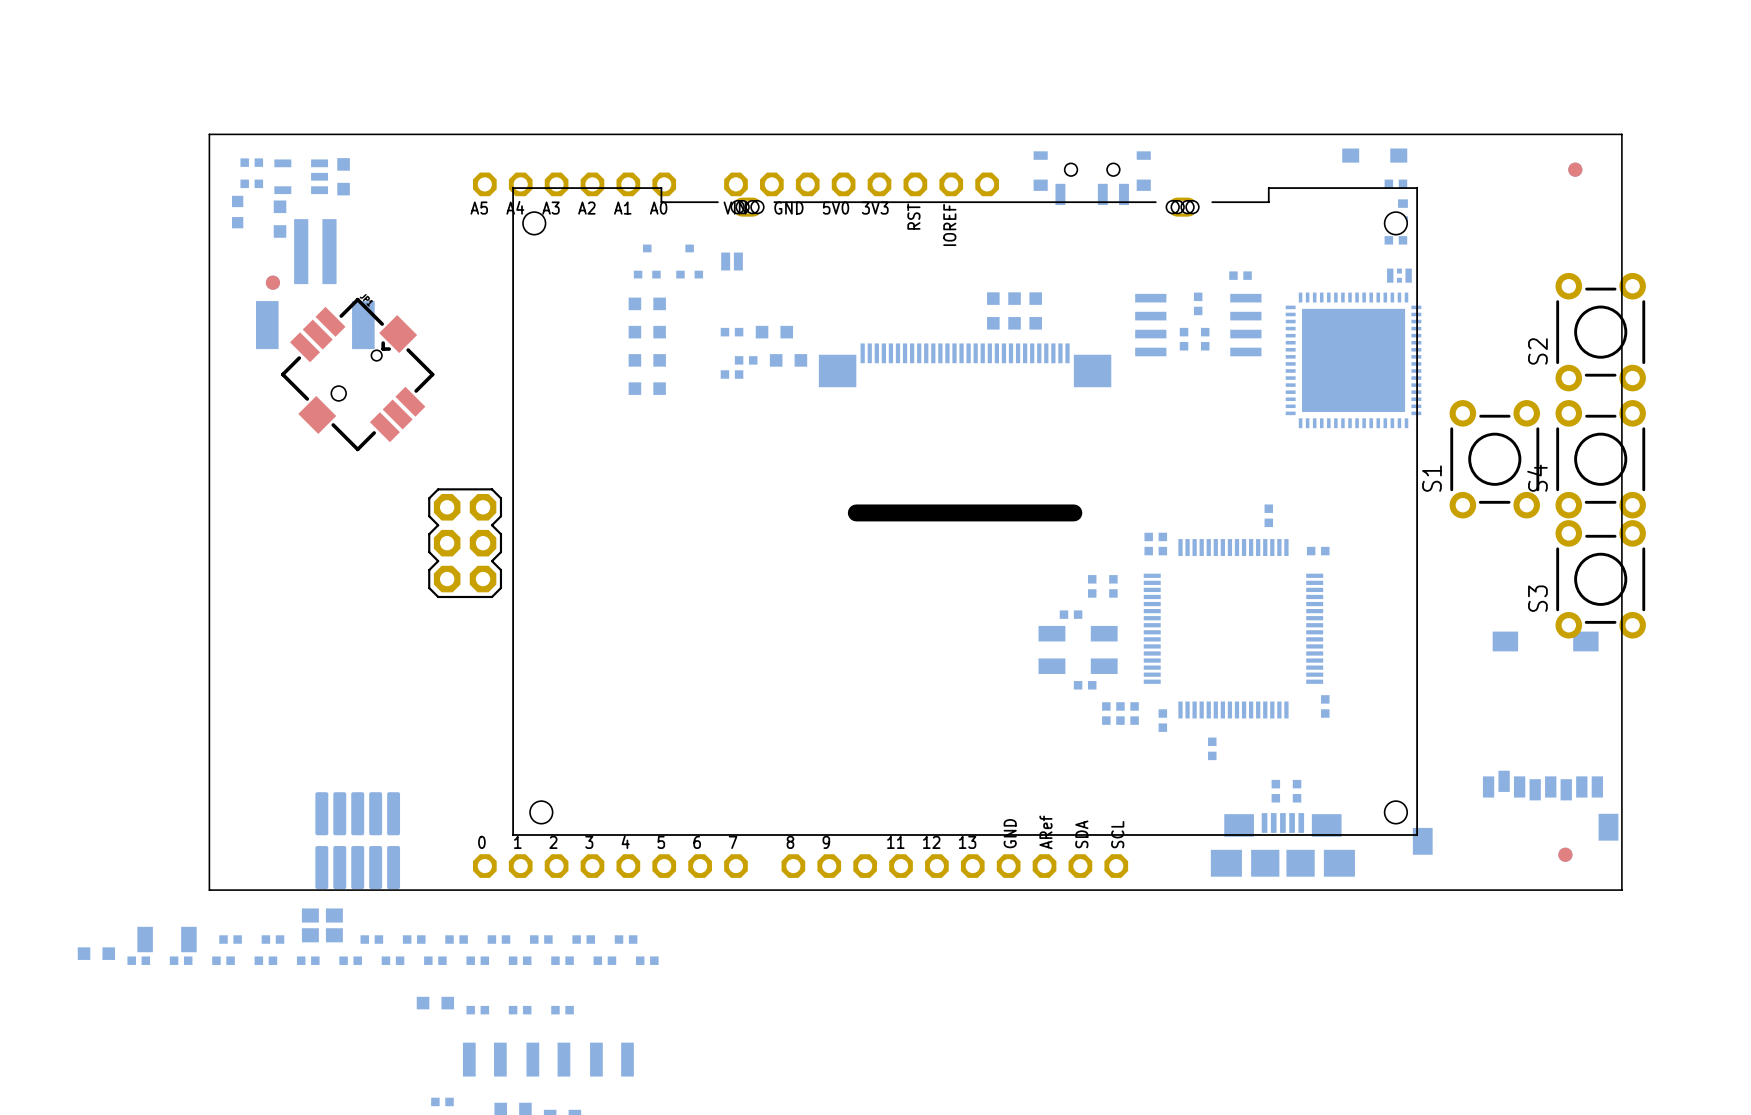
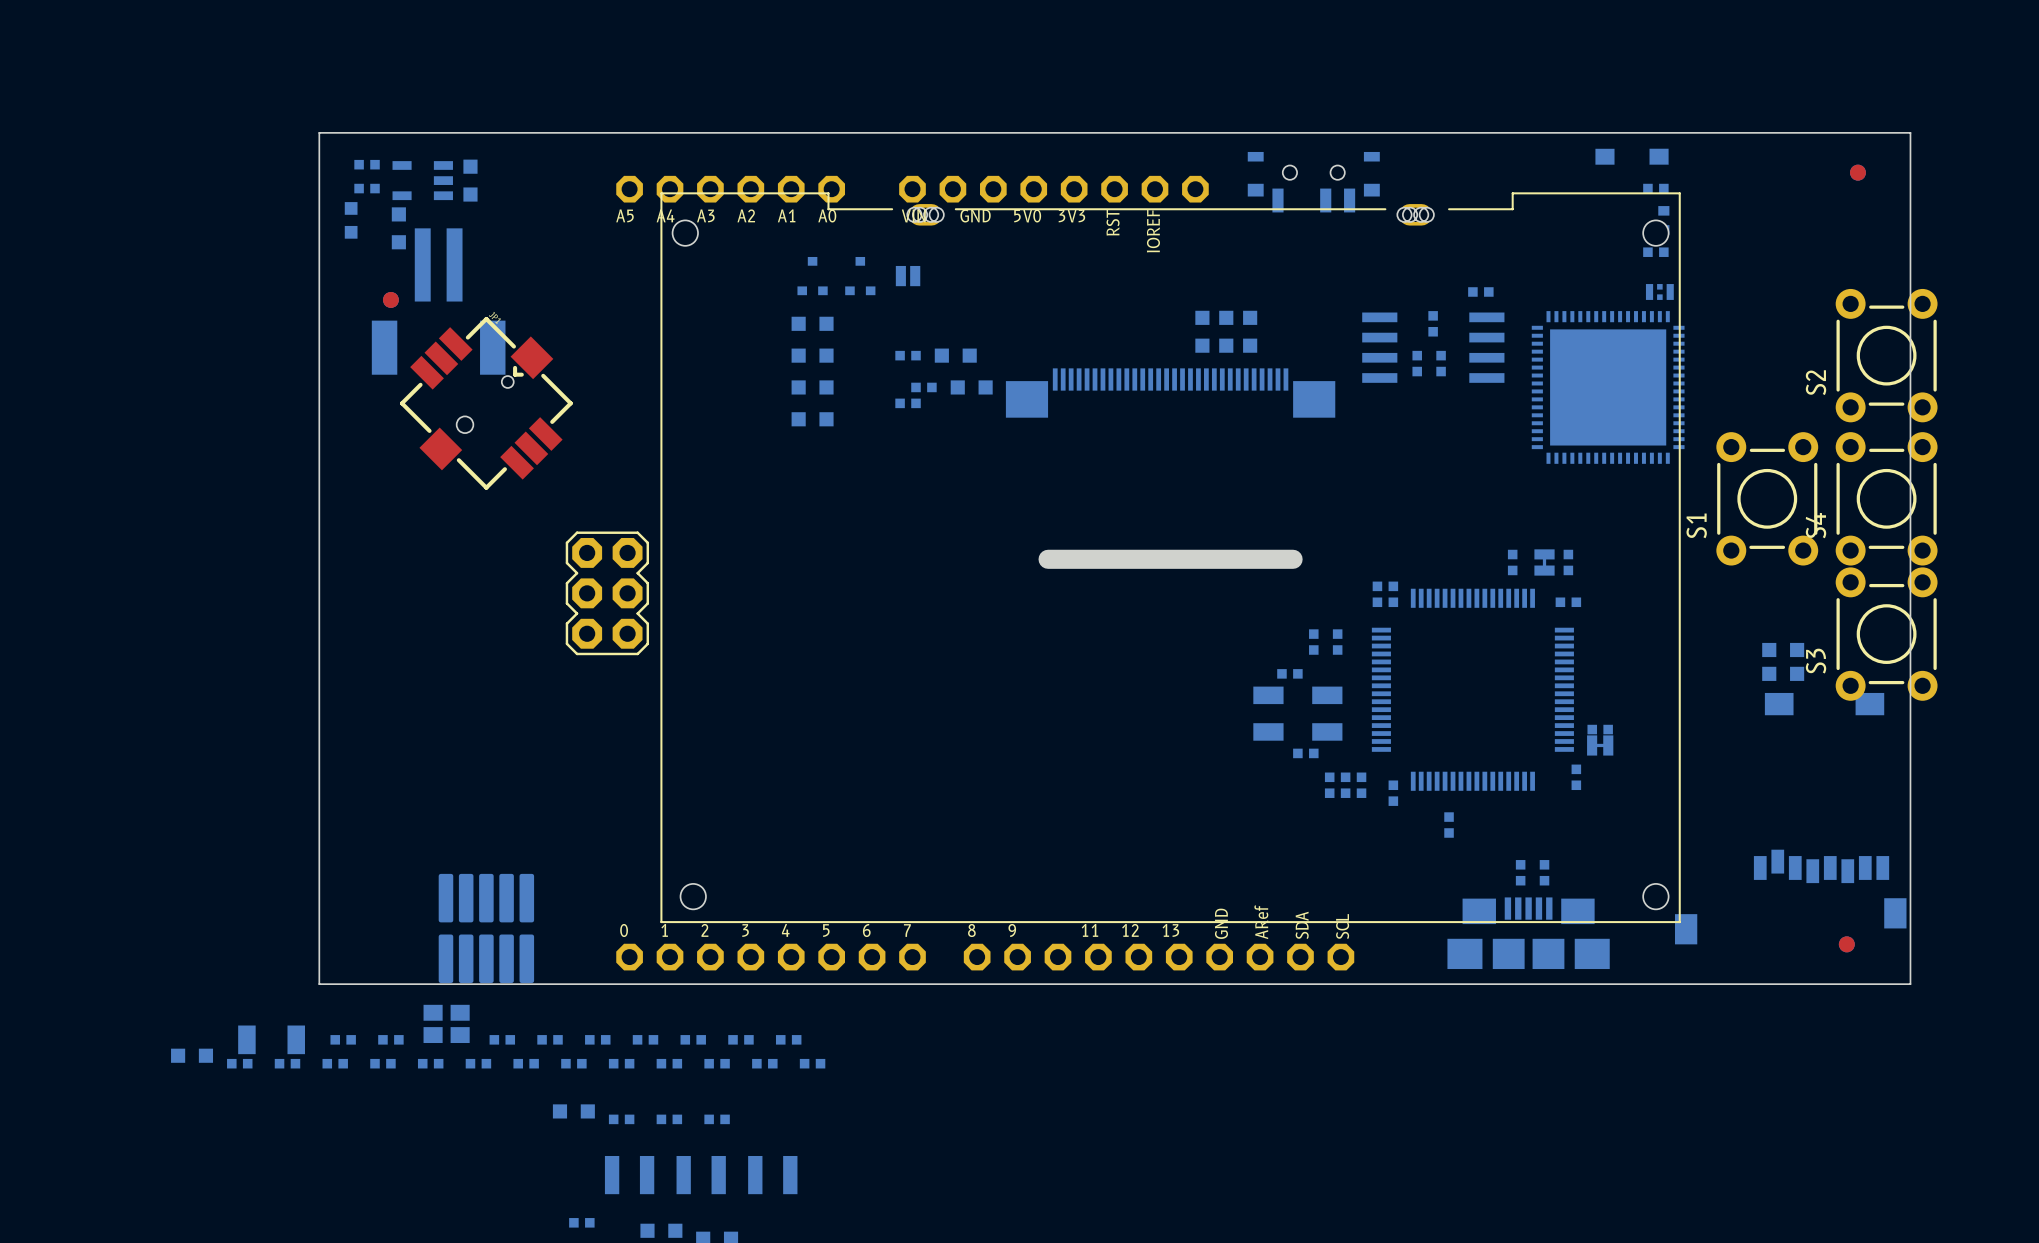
part: none -> (1544, 562)
part: none -> (1568, 562)
part: none -> (1783, 649)
part: none -> (1783, 673)
part: none -> (1600, 729)
part: none -> (1600, 745)

